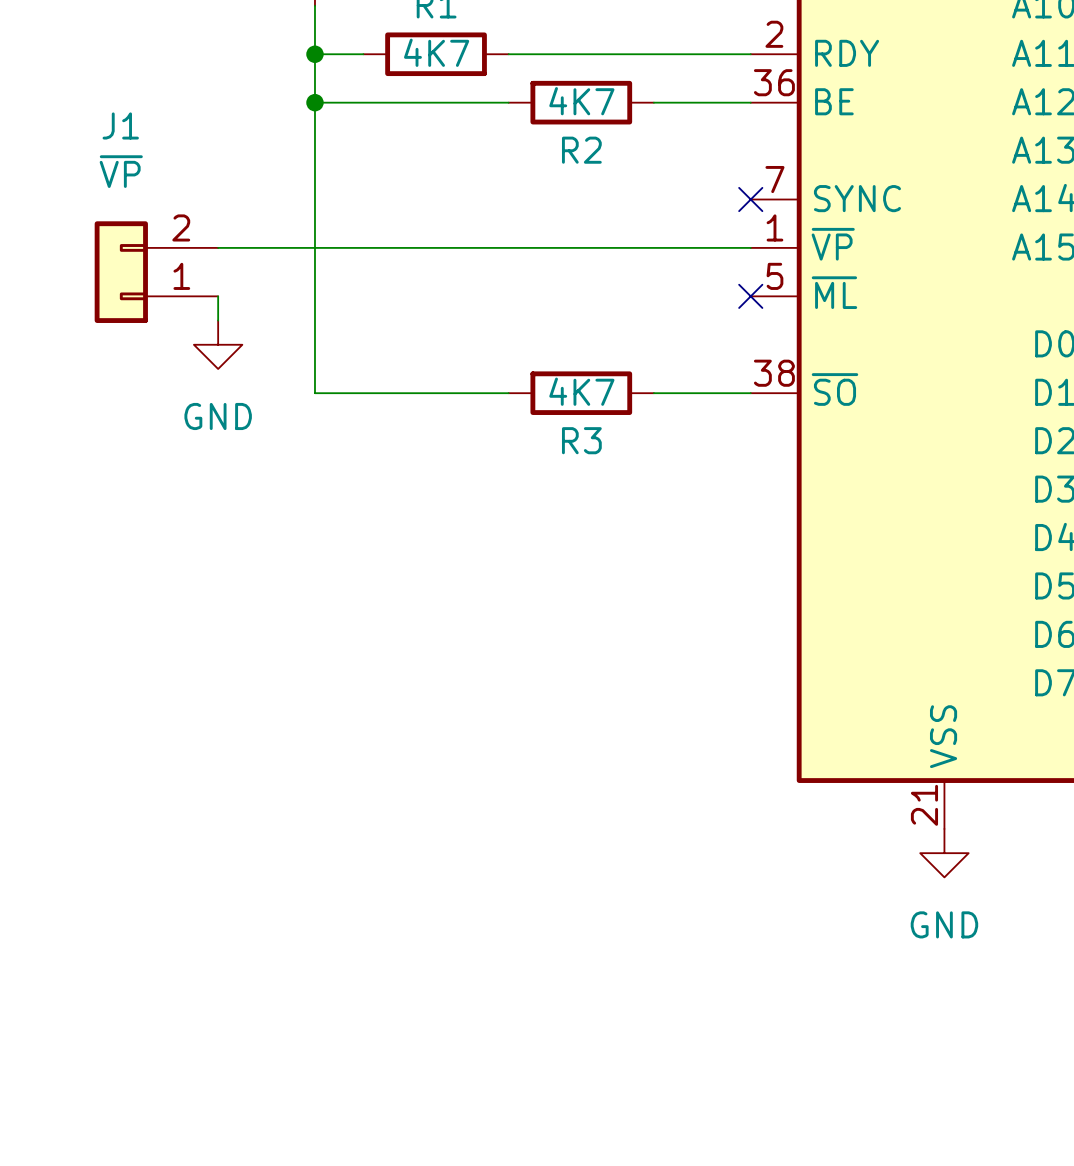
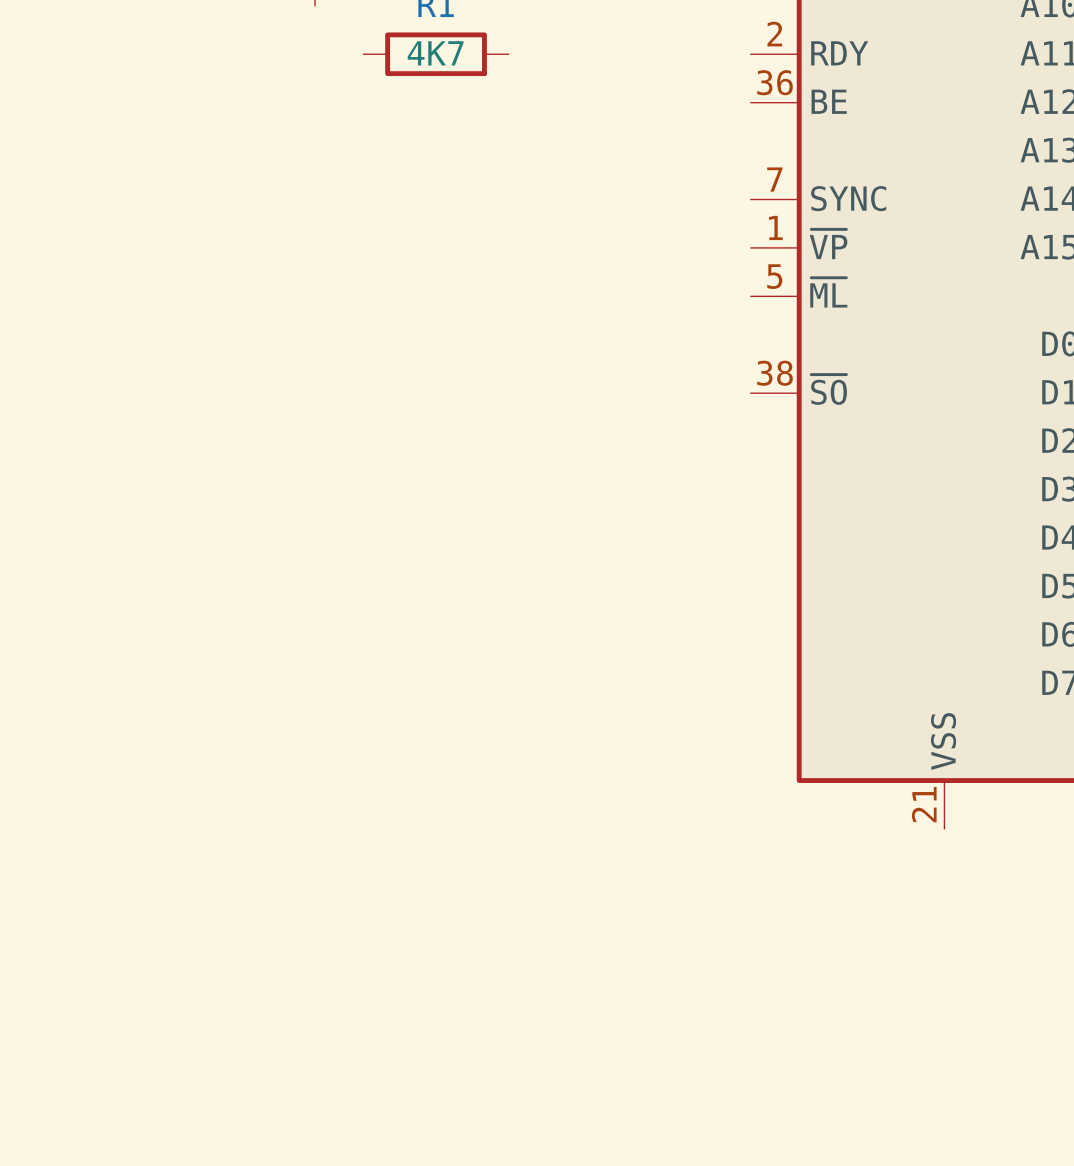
wire: (314, 5) (314, 393) (508, 393) -> none
wire: (314, 54) (363, 54) -> none
junction: (314, 54) -> none
wire: (508, 54) (750, 54) -> none
wire: (314, 102) (508, 102) -> none
junction: (314, 102) -> none
R2: 4K7 (581, 102) -> none
wire: (653, 102) (750, 102) -> none
no-connect mark: (750, 199) -> none
wire: (218, 247) (750, 247) -> none
J1: ~{VP} (156, 272) -> none
wire: (218, 296) (218, 320) -> none
no-connect mark: (750, 296) -> none
power symbol: GND (218, 344) -> none
R3: 4K7 (581, 393) -> none
wire: (653, 393) (750, 393) -> none
power symbol: GND (944, 853) -> none

